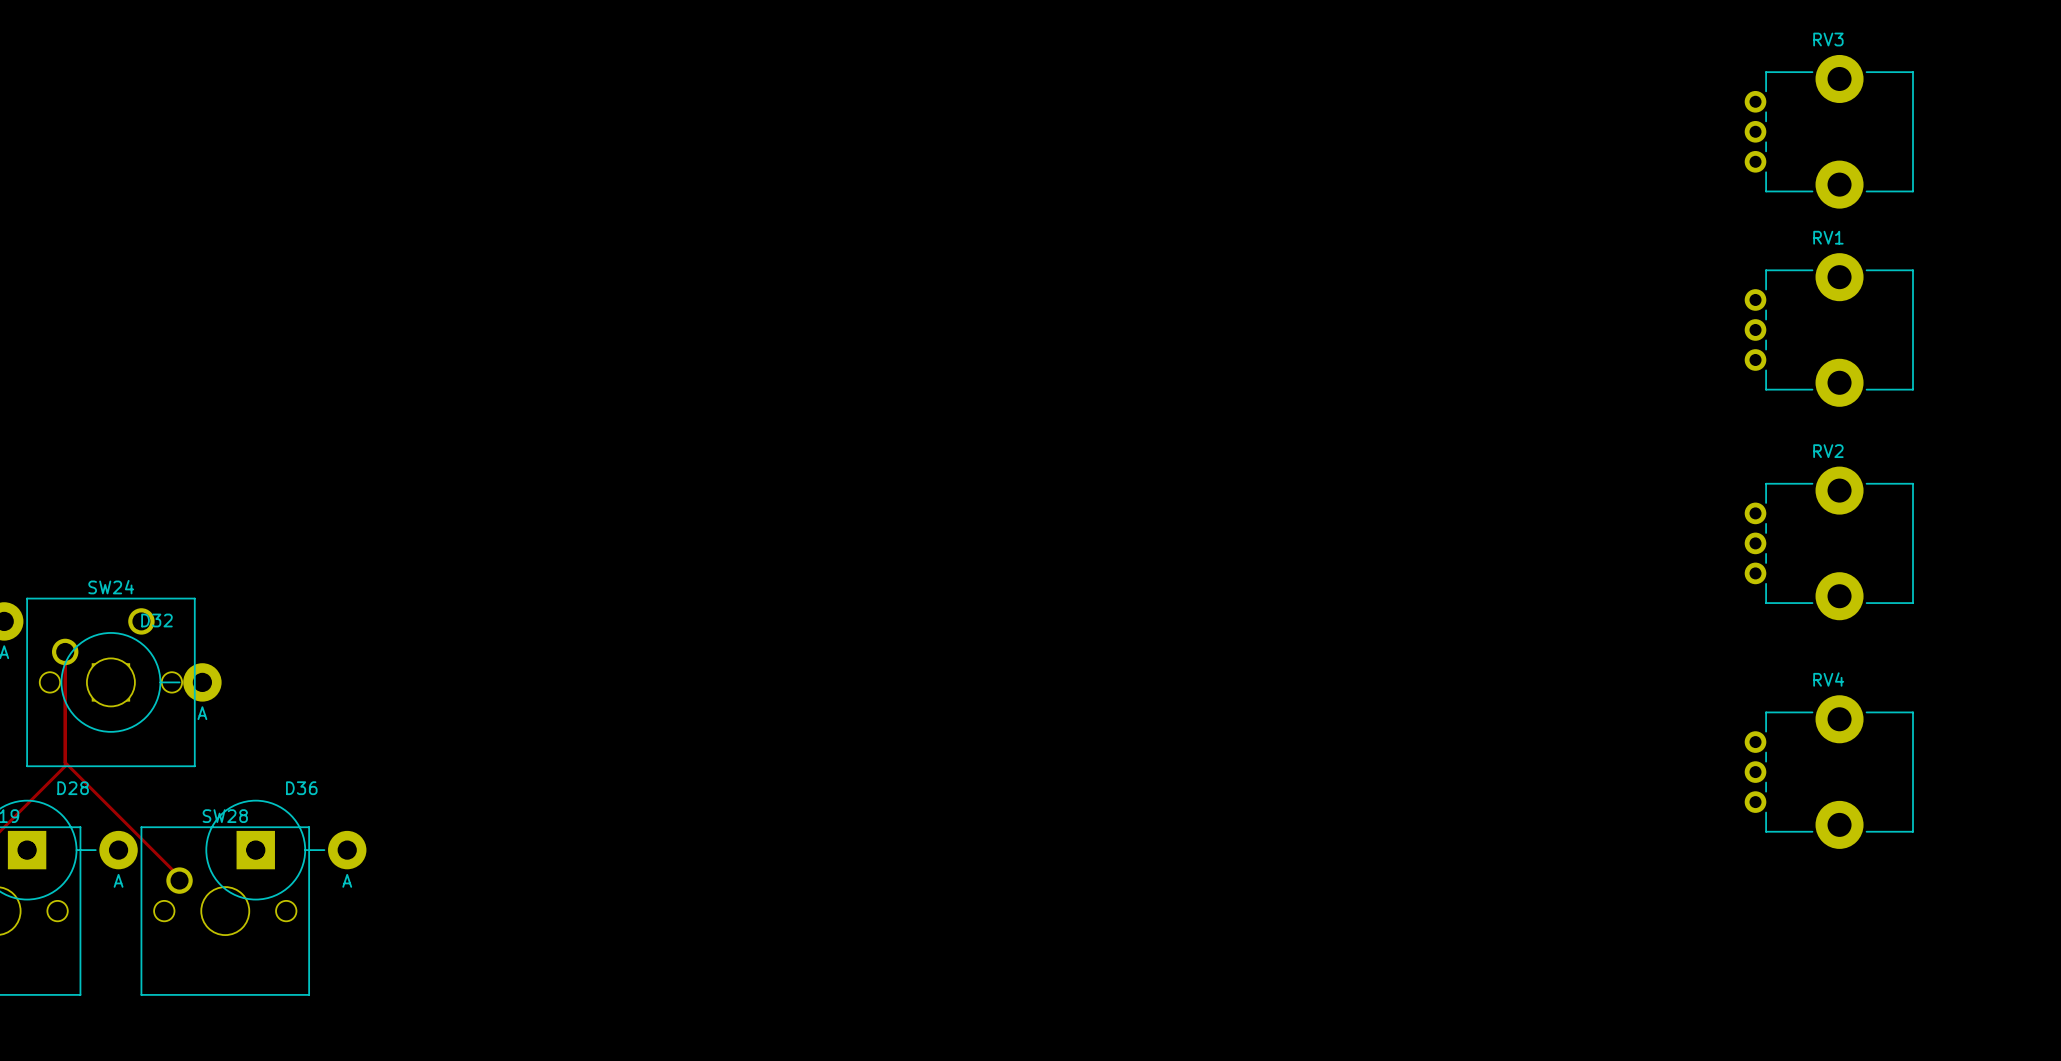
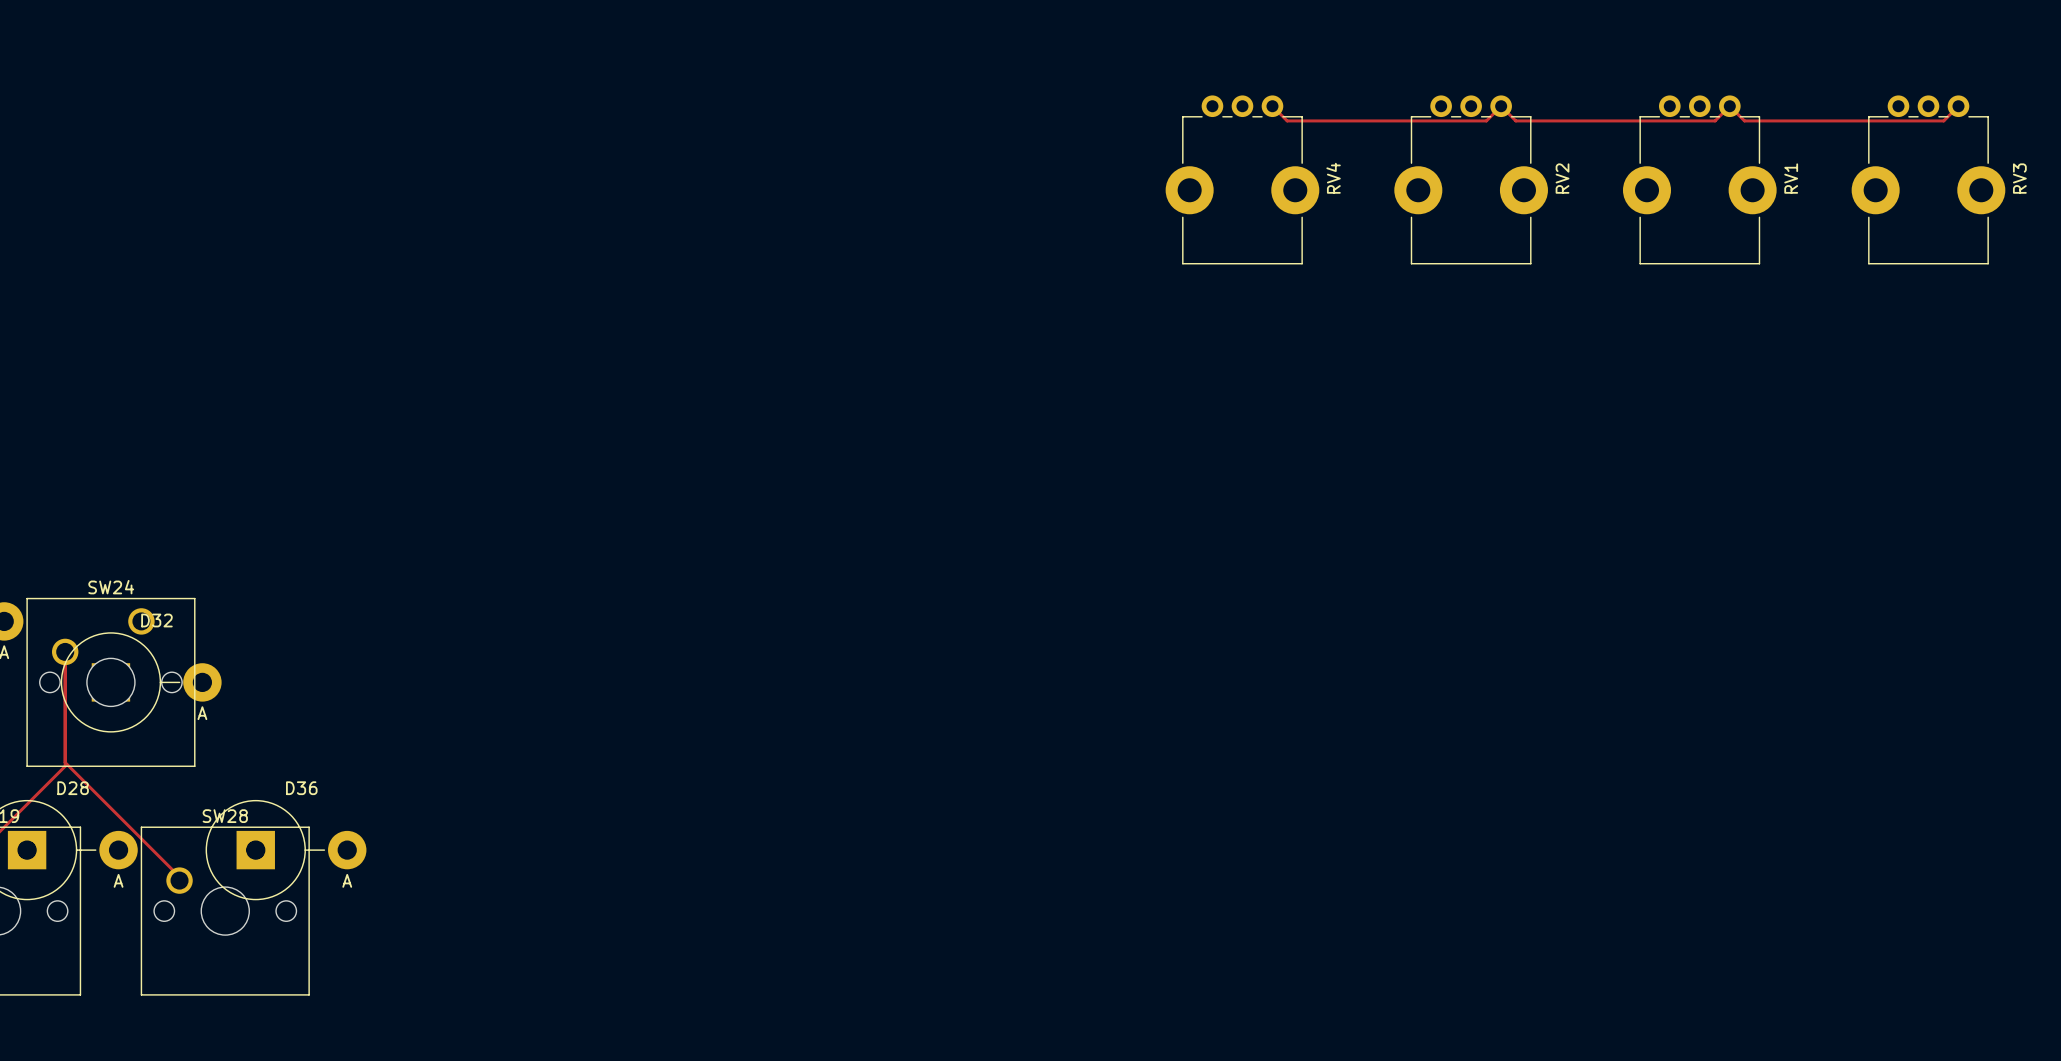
track: none -> (1272, 106) (1287, 120) (1486, 120) (1501, 106) (1515, 120) (1715, 120) (1729, 106) (1744, 120) (1943, 120) (1958, 106)
RV3 rotation: 0° (1829, 131) -> 90° clockwise (1928, 179)
RV3 position: (1829, 131) -> (1928, 179)
RV1 rotation: 0° (1829, 329) -> 90° clockwise (1699, 179)
RV1 position: (1829, 329) -> (1699, 179)
RV2 rotation: 0° (1829, 543) -> 90° clockwise (1471, 179)
RV2 position: (1829, 543) -> (1471, 179)
RV4 rotation: 0° (1829, 772) -> 90° clockwise (1242, 179)
RV4 position: (1829, 772) -> (1242, 179)

